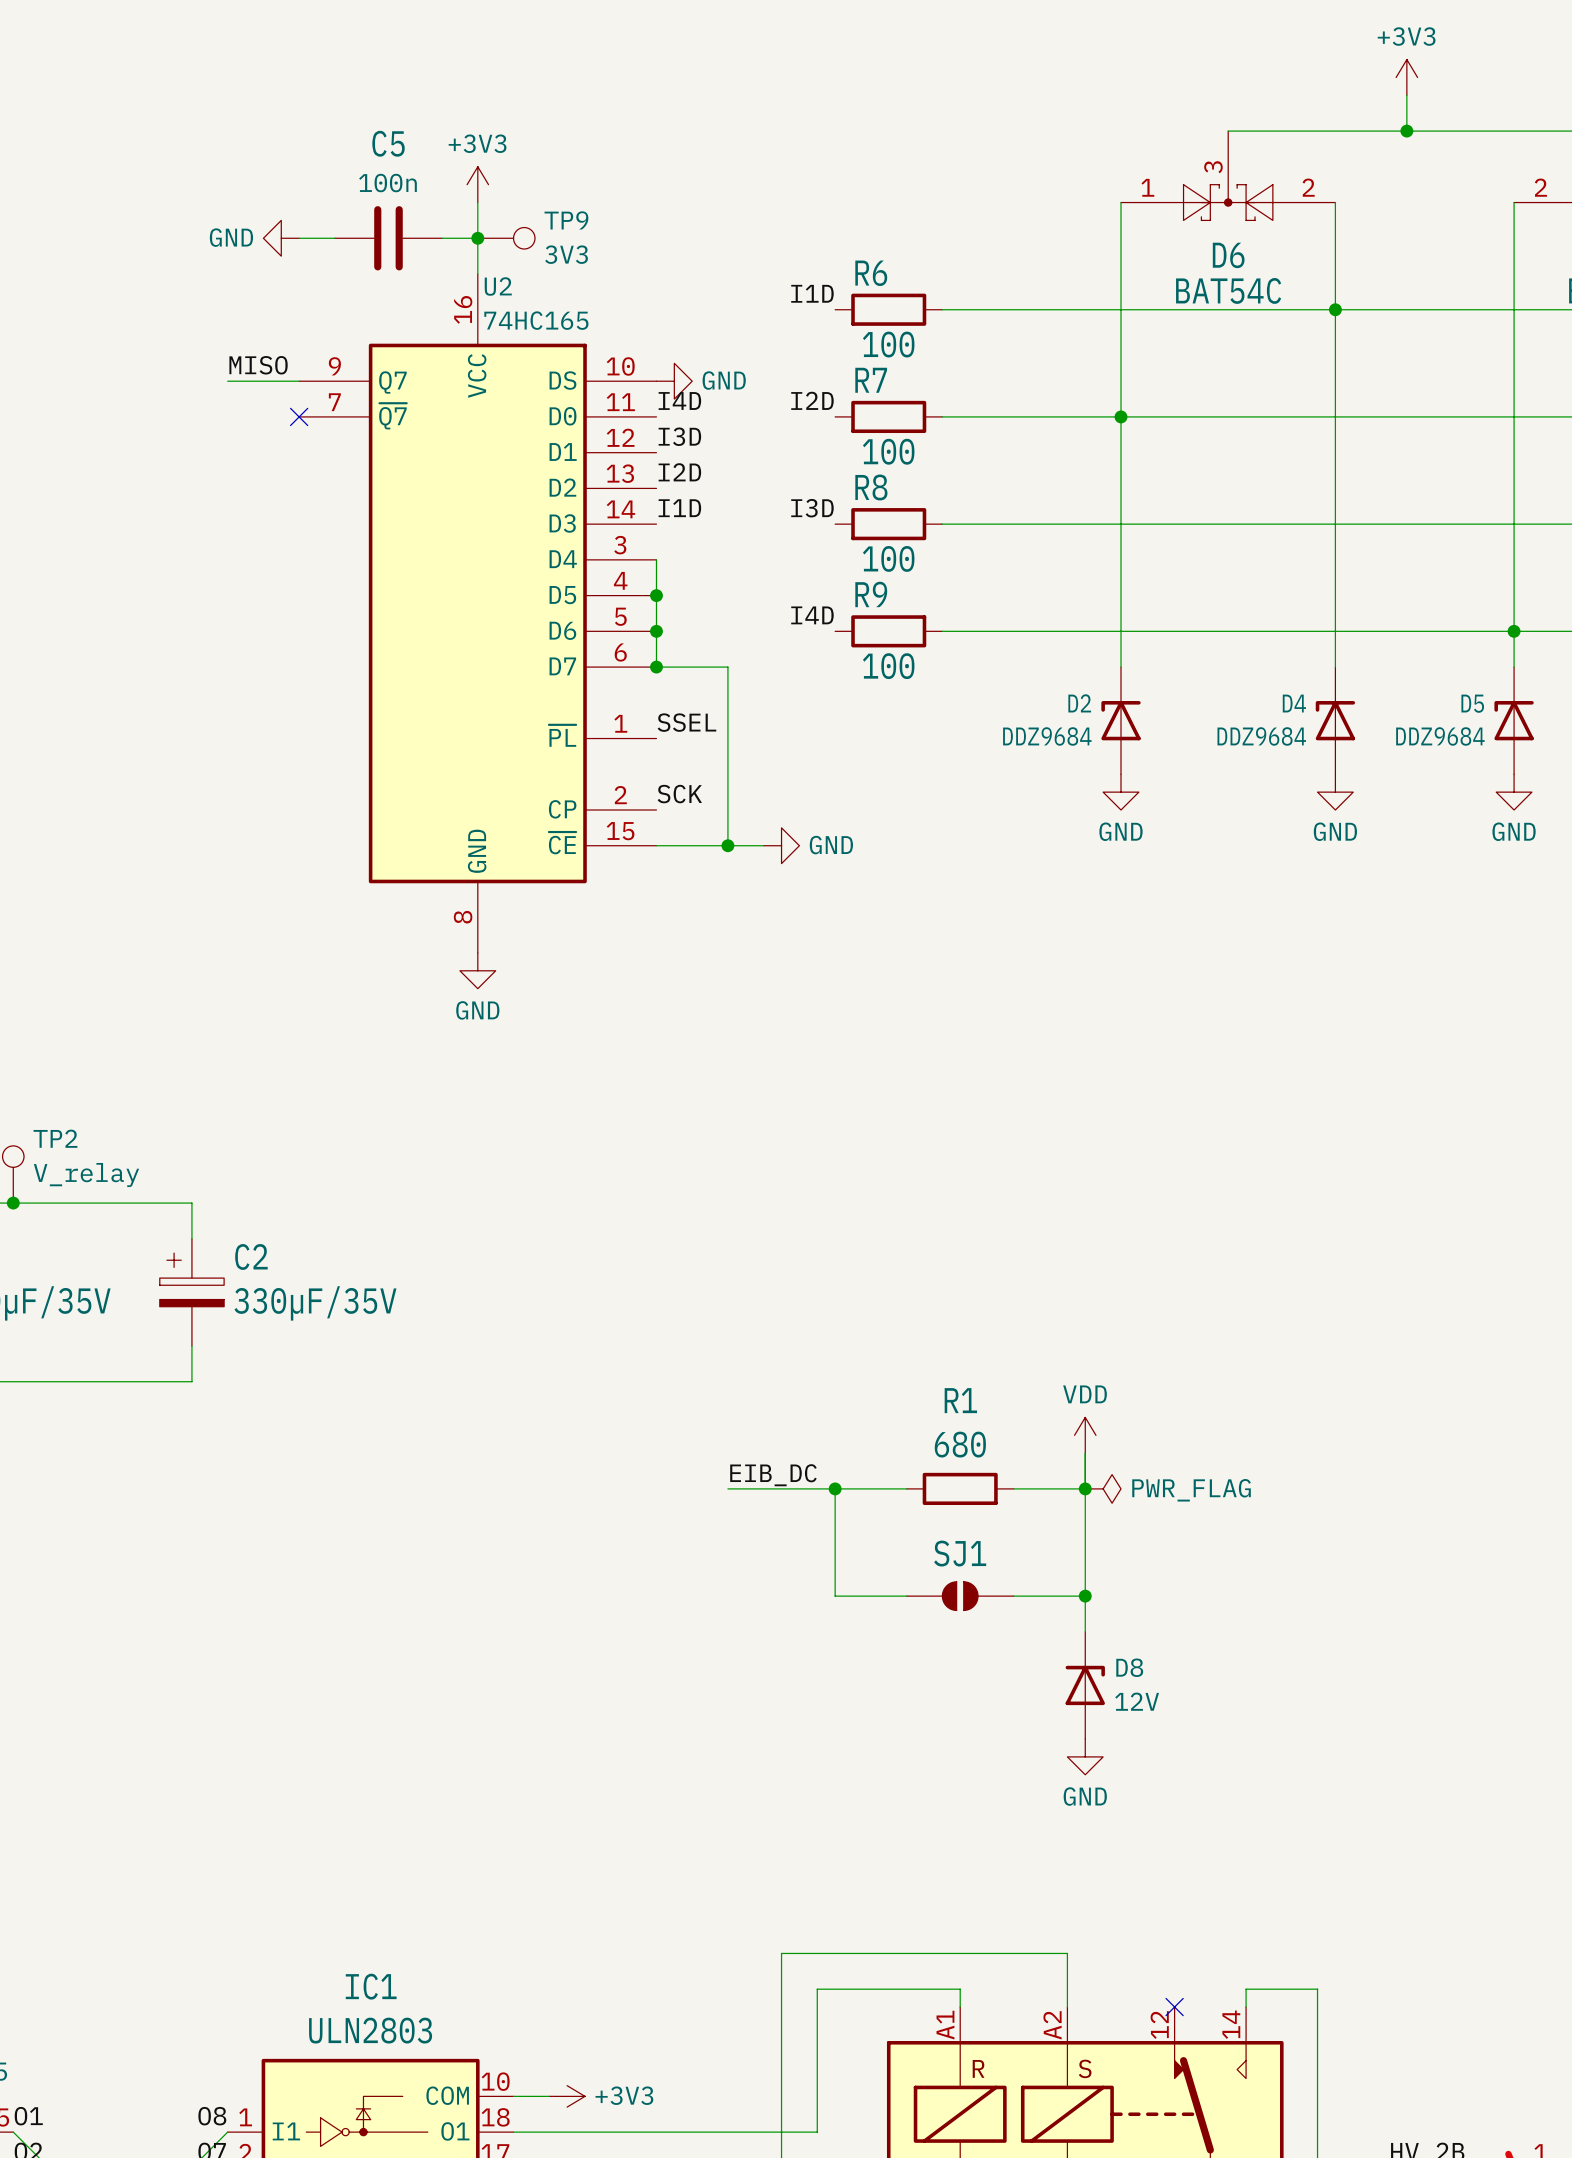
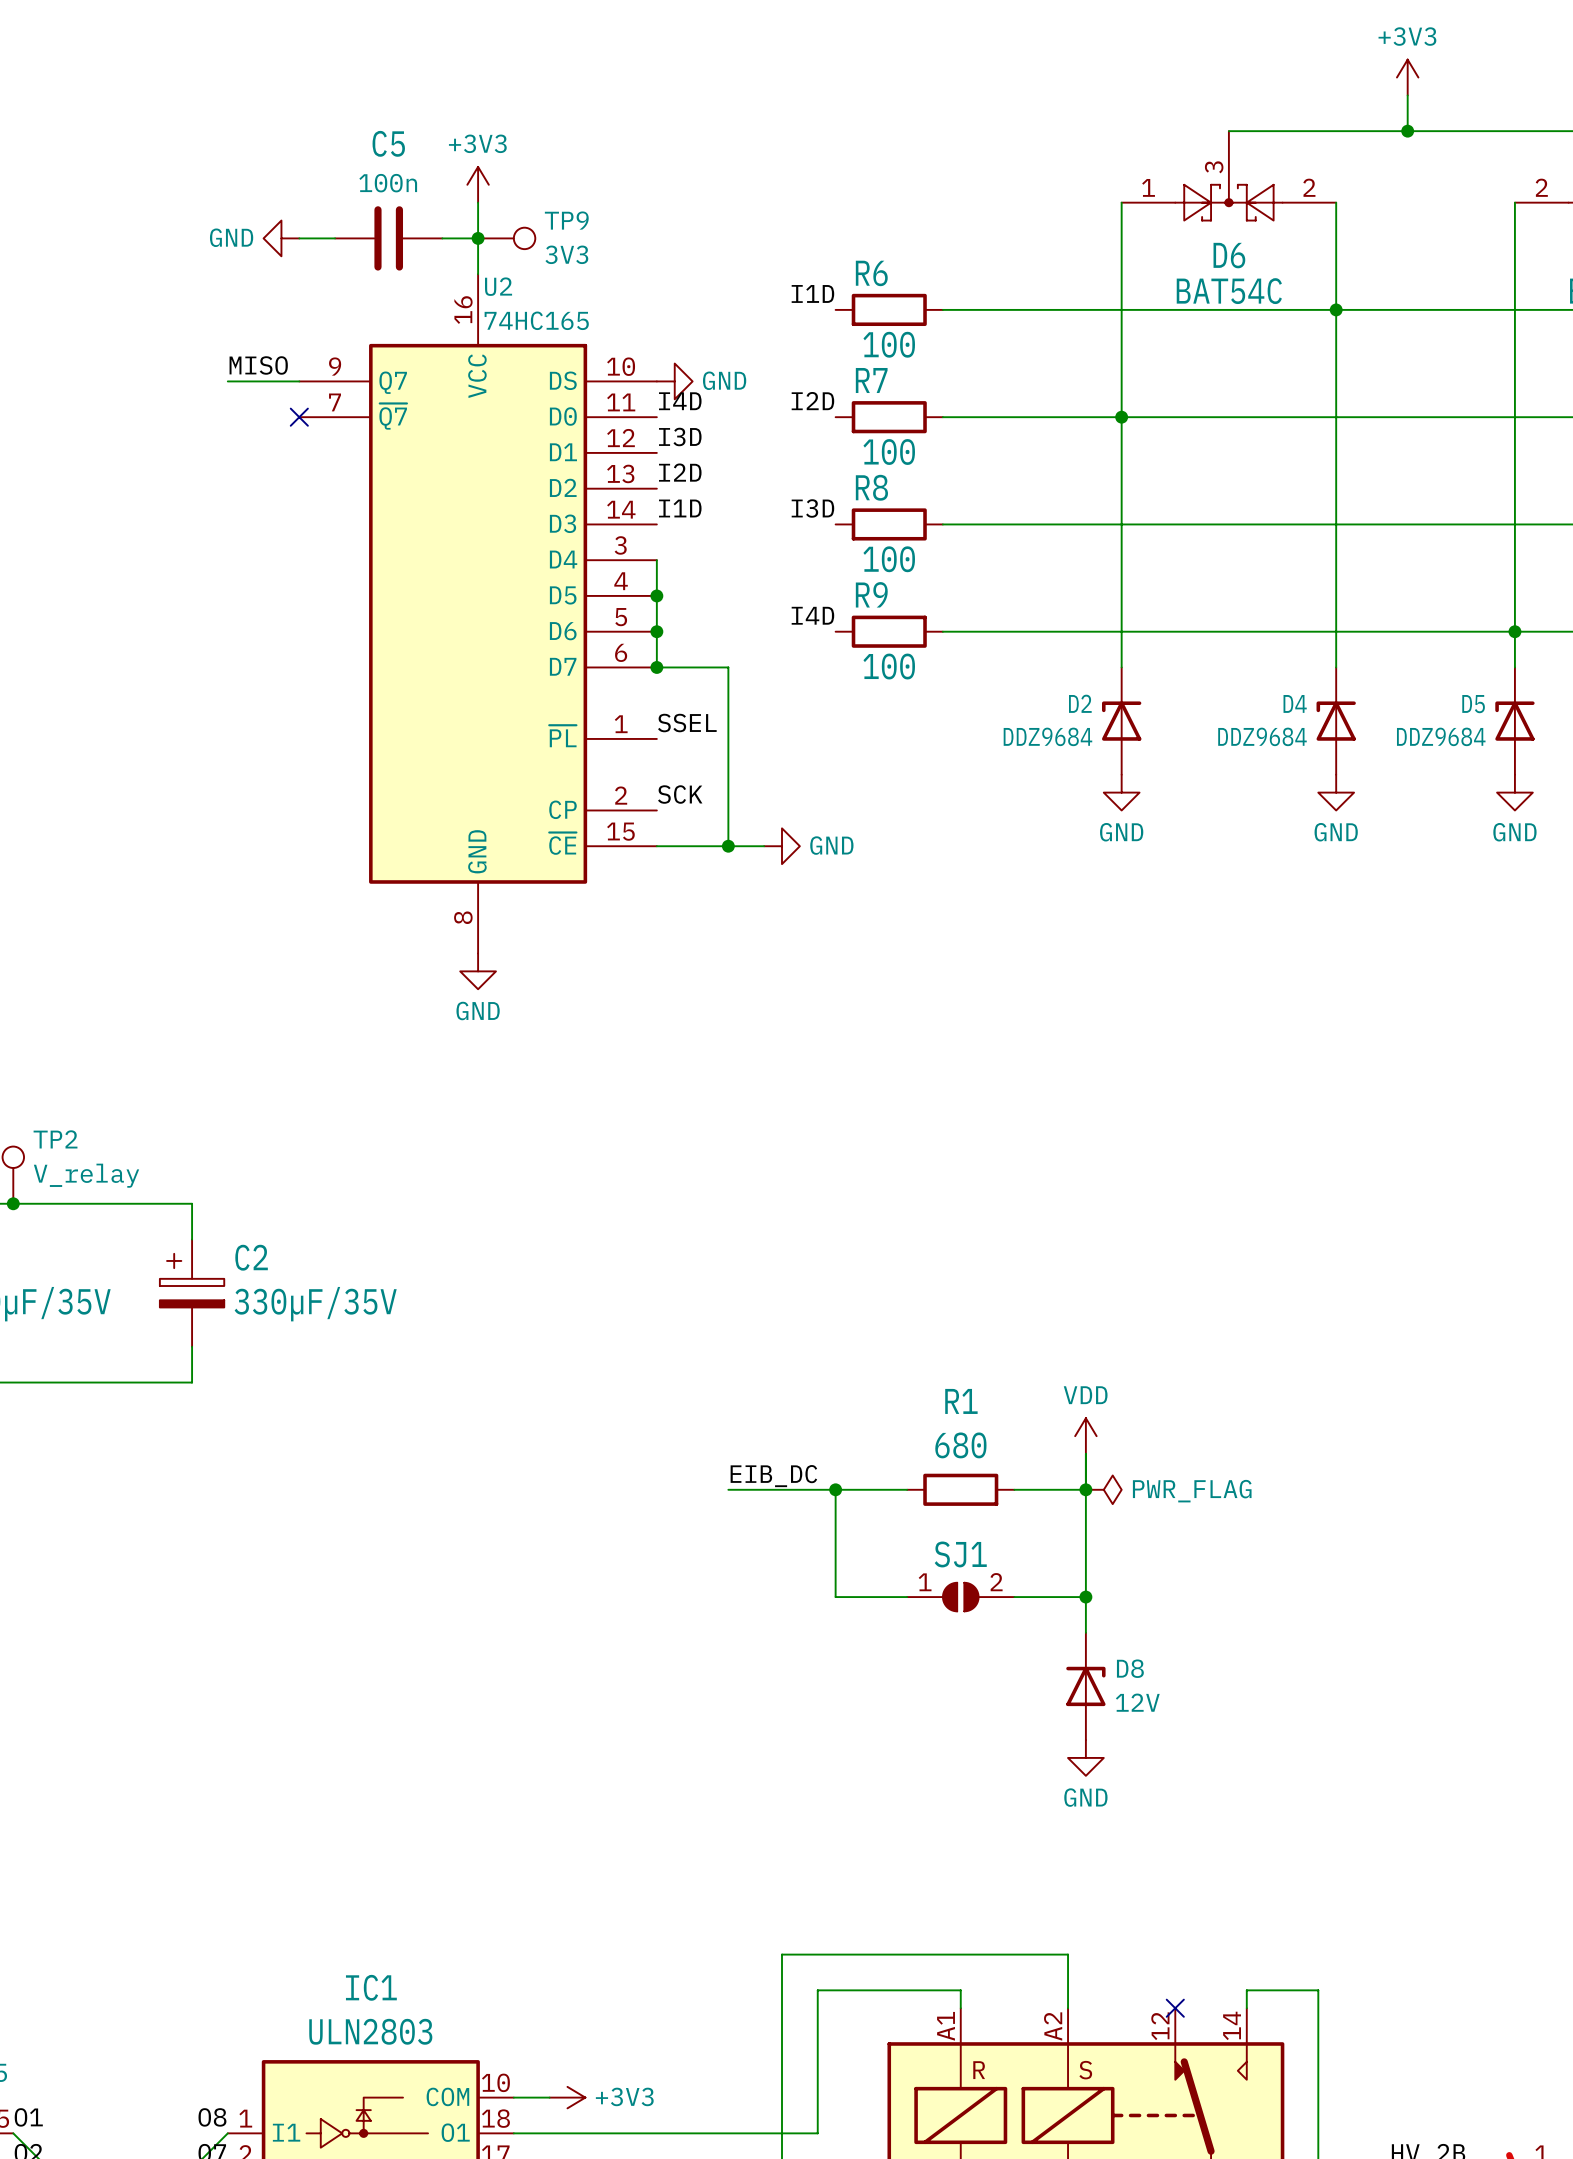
SJ1 pin number: none -> 1 (925, 1582)
SJ1 pin number: none -> 2 (996, 1582)

